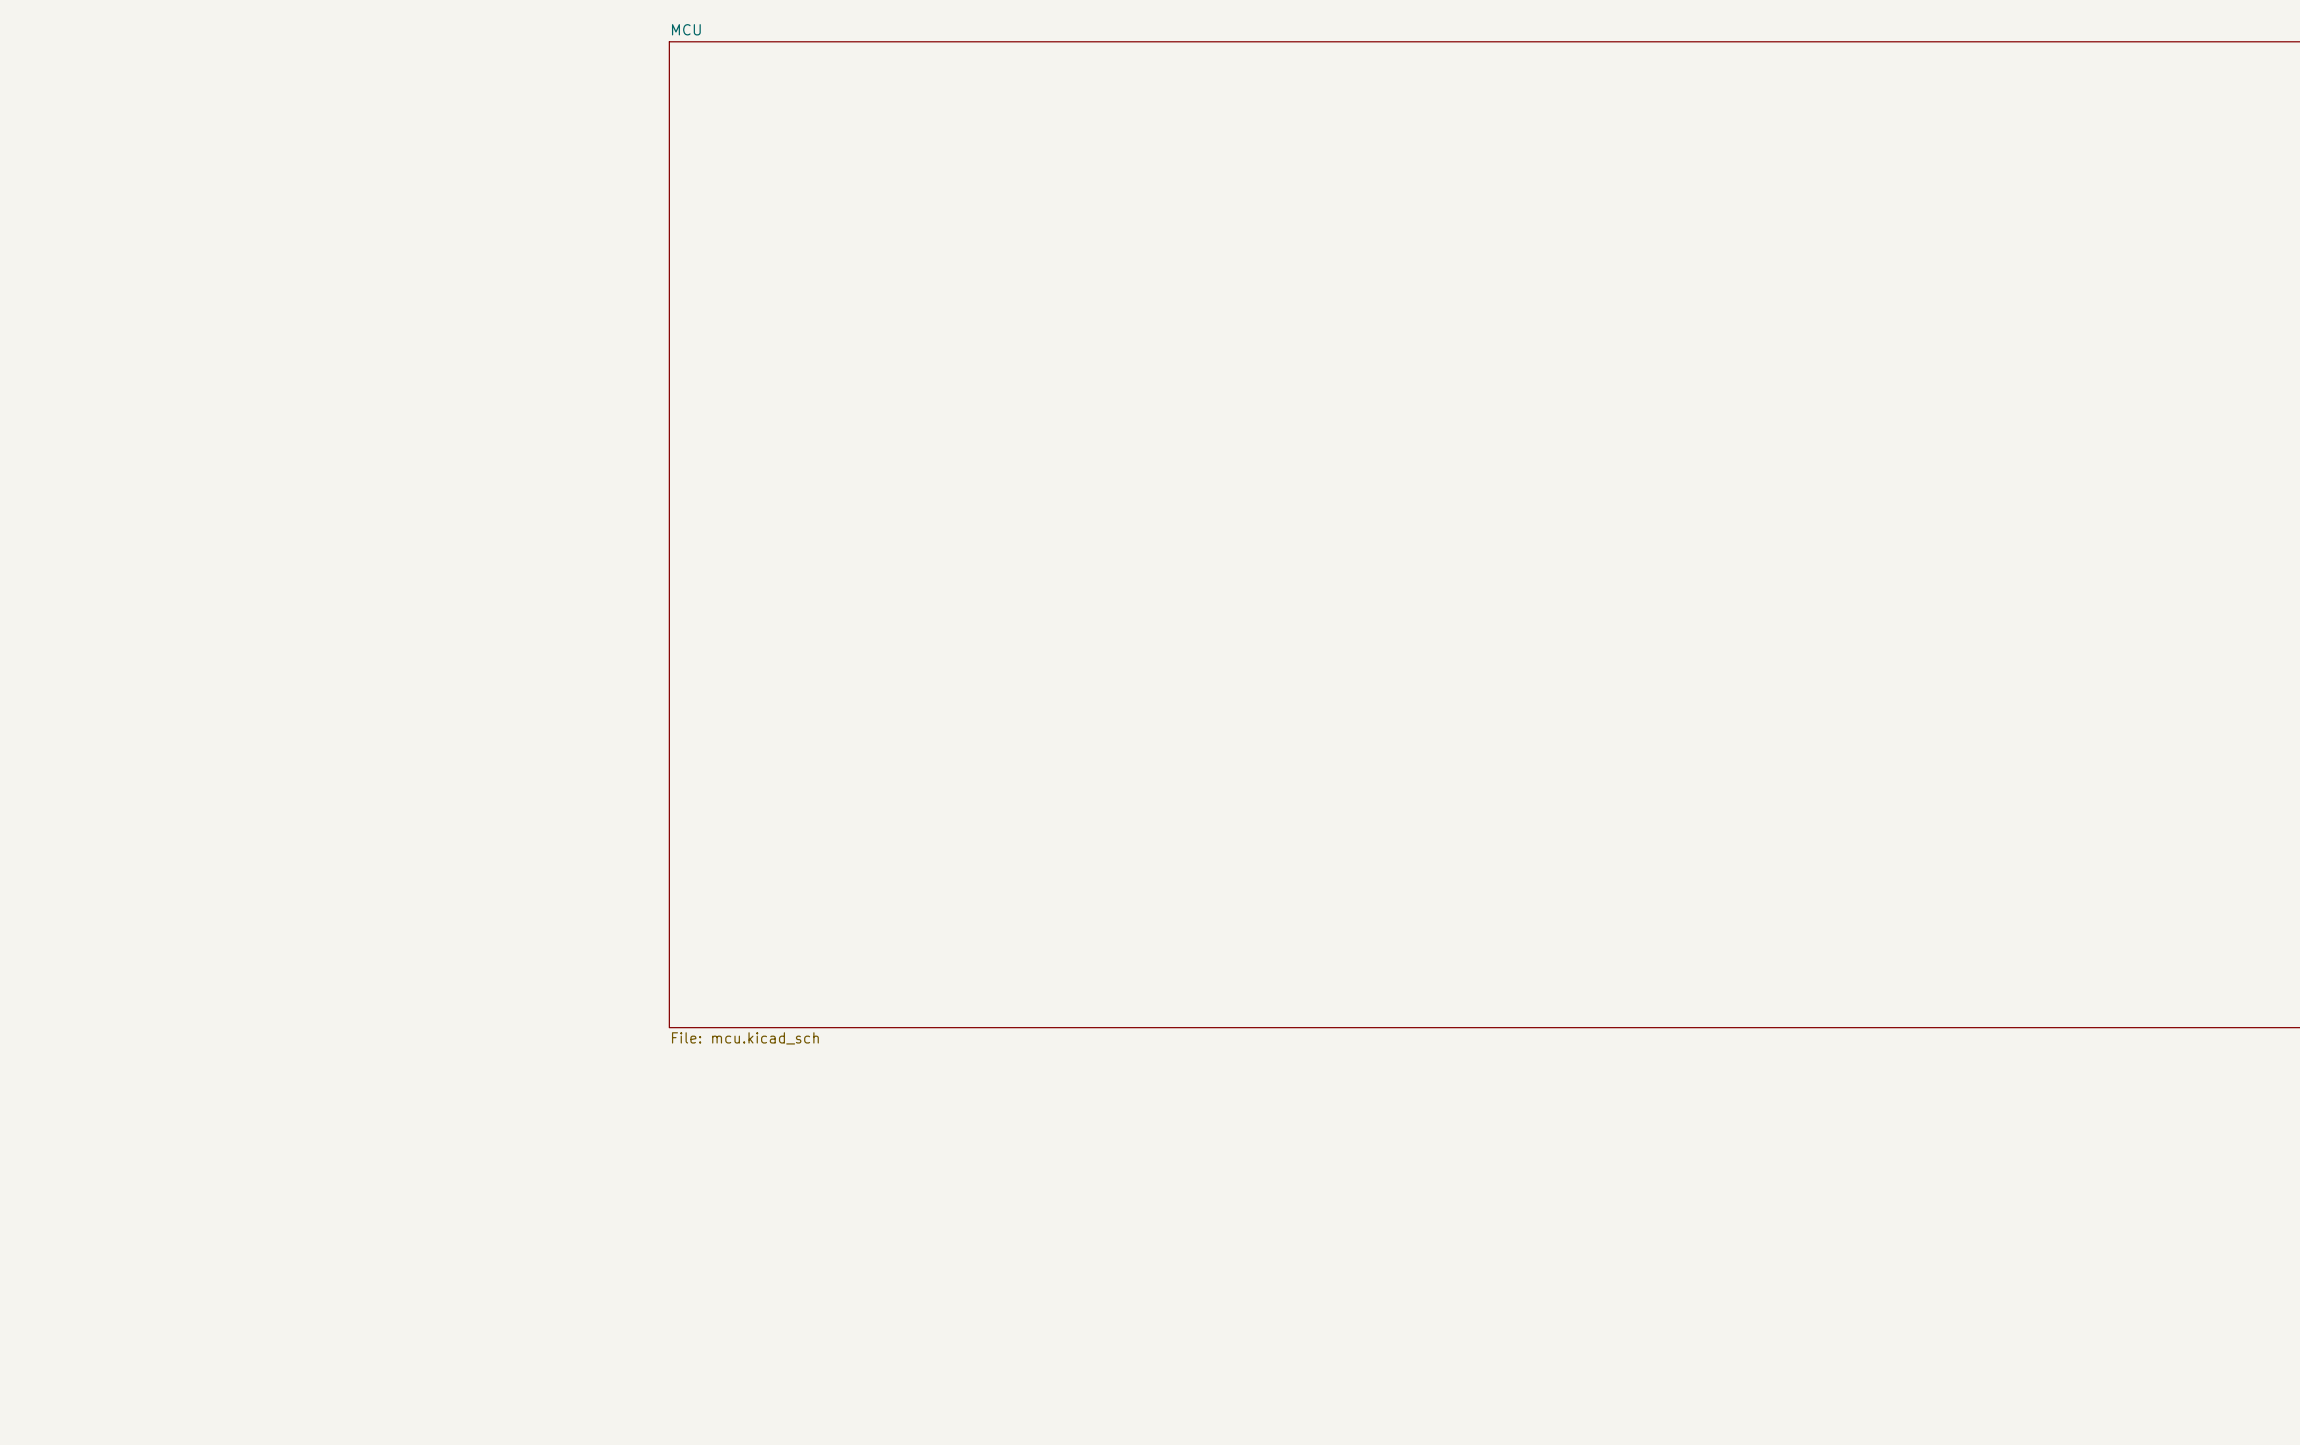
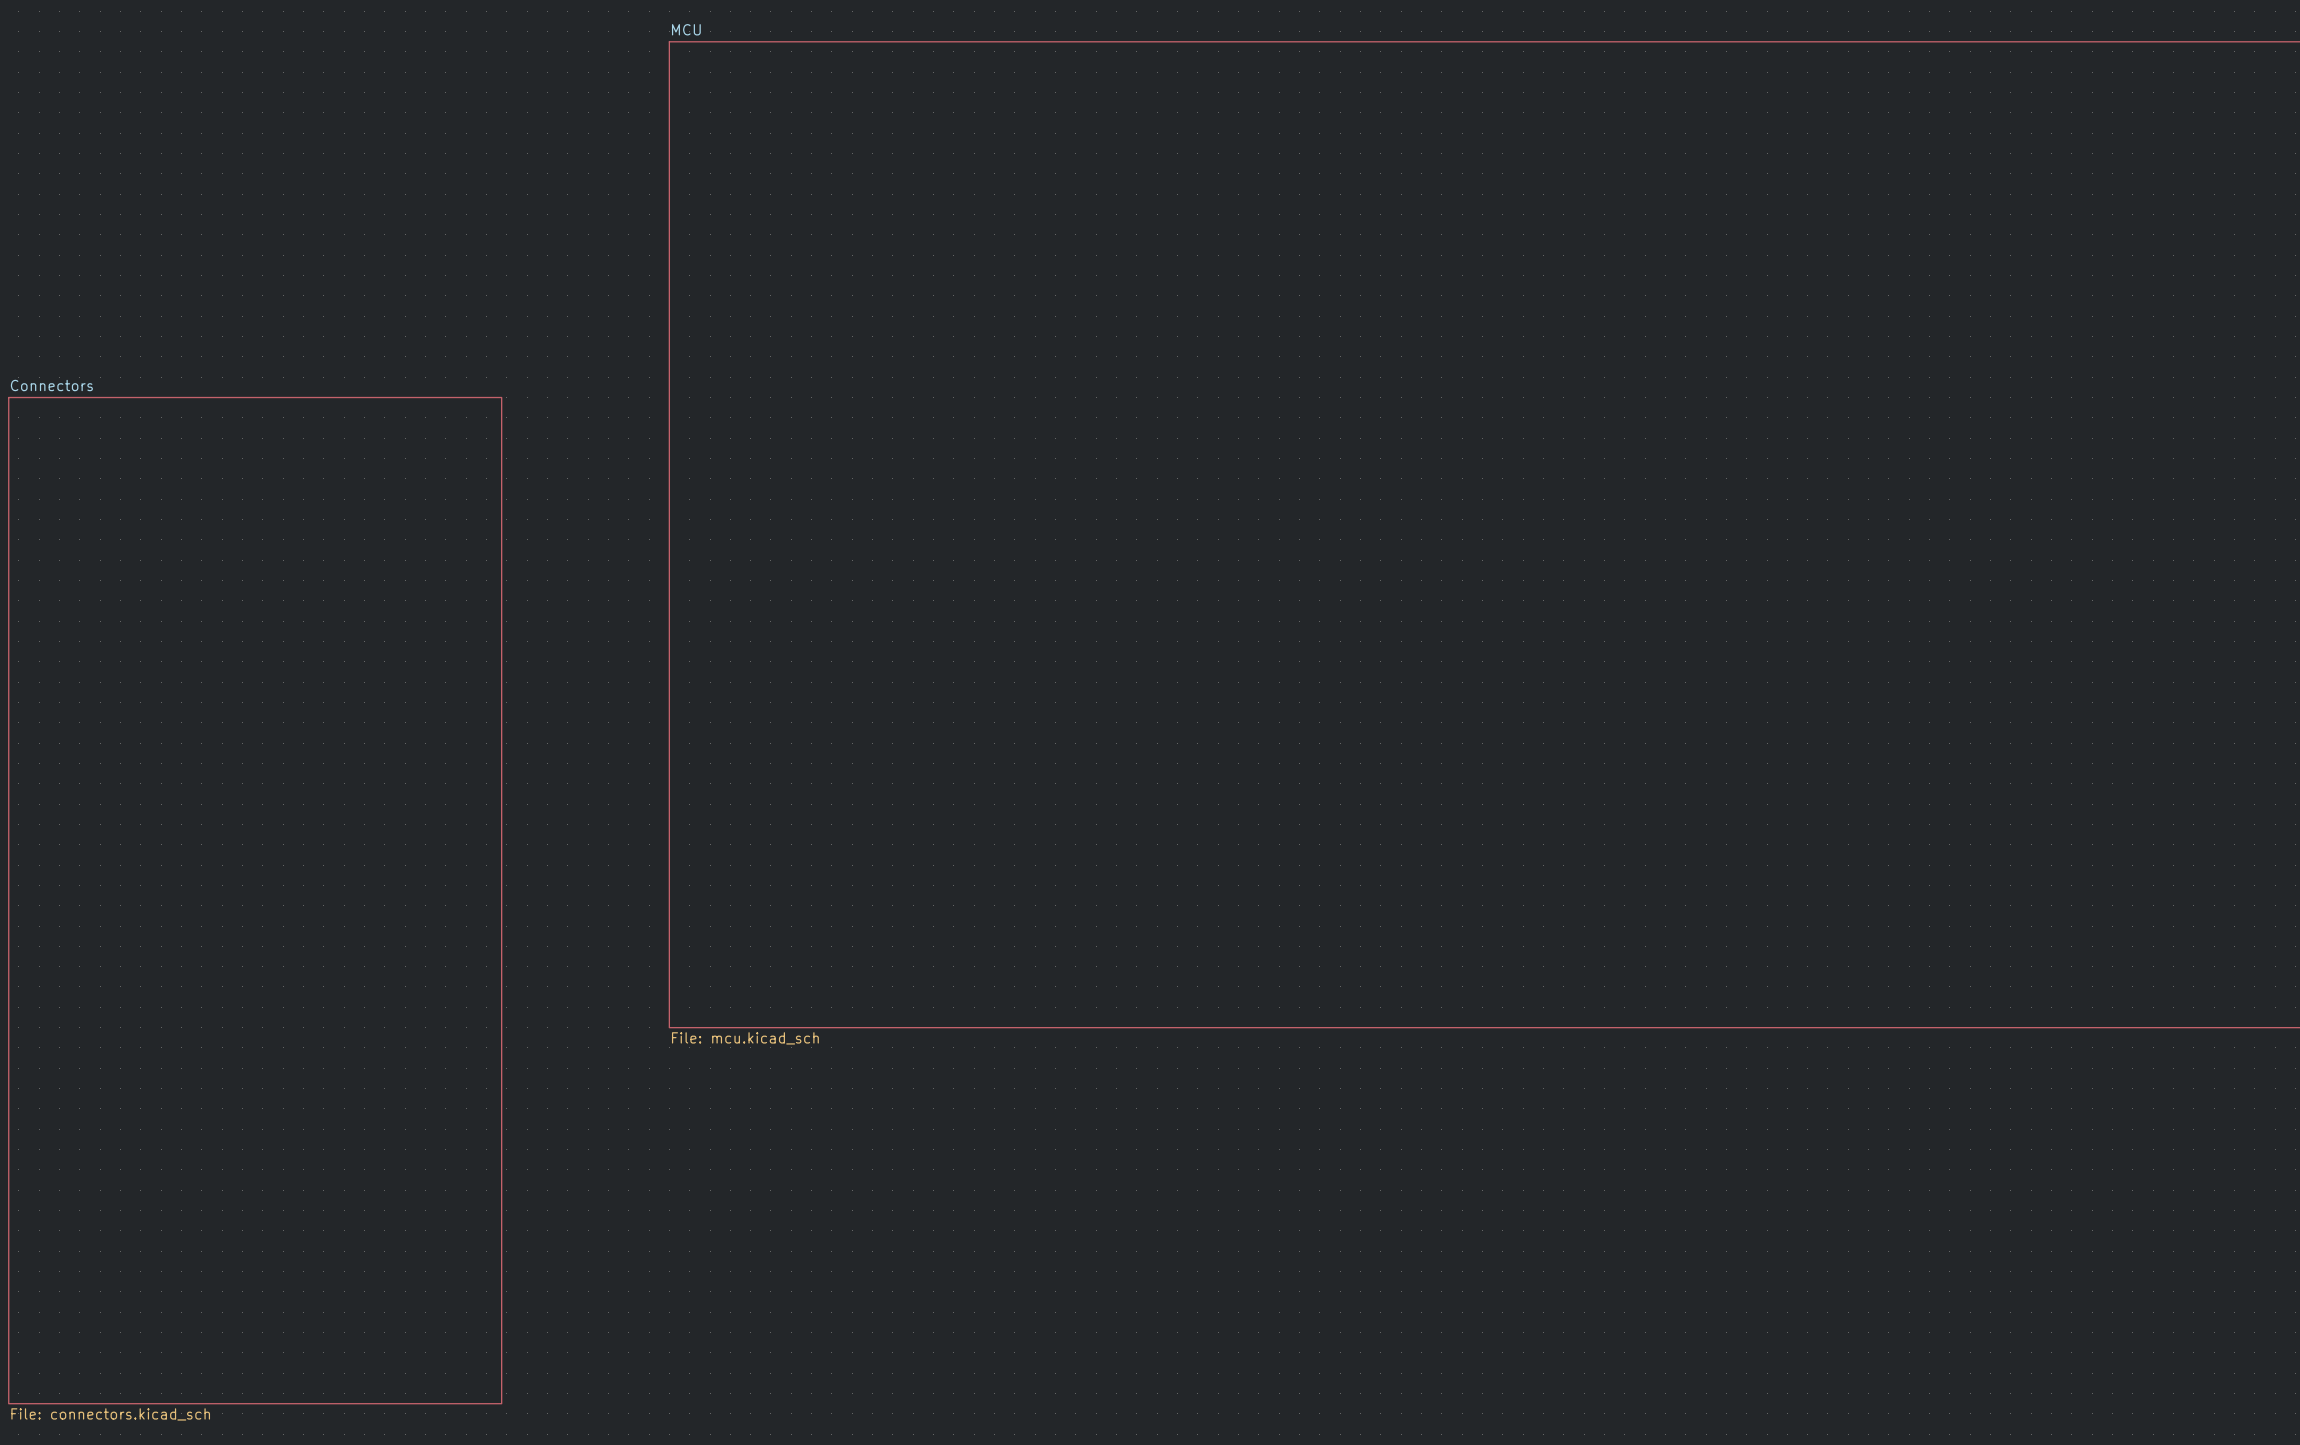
sheet Connectors: none -> File: connectors.kicad_sch (255, 900)

